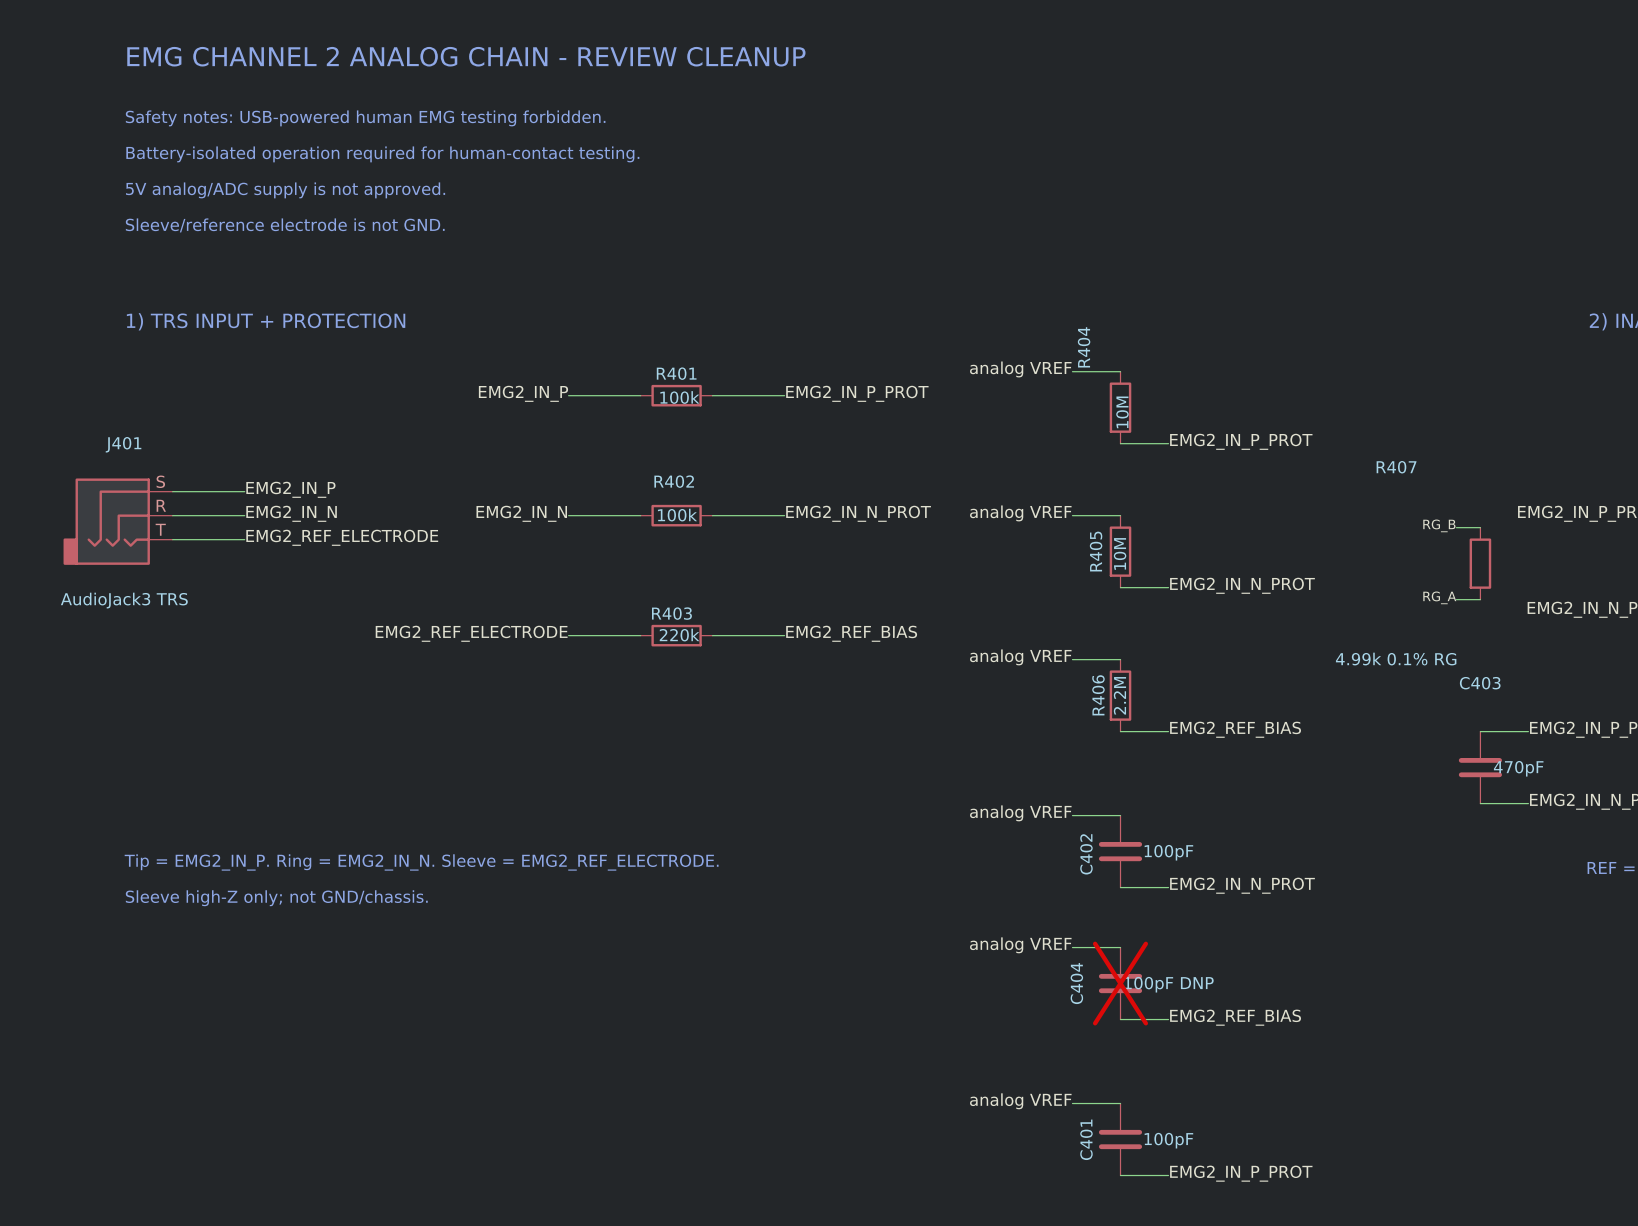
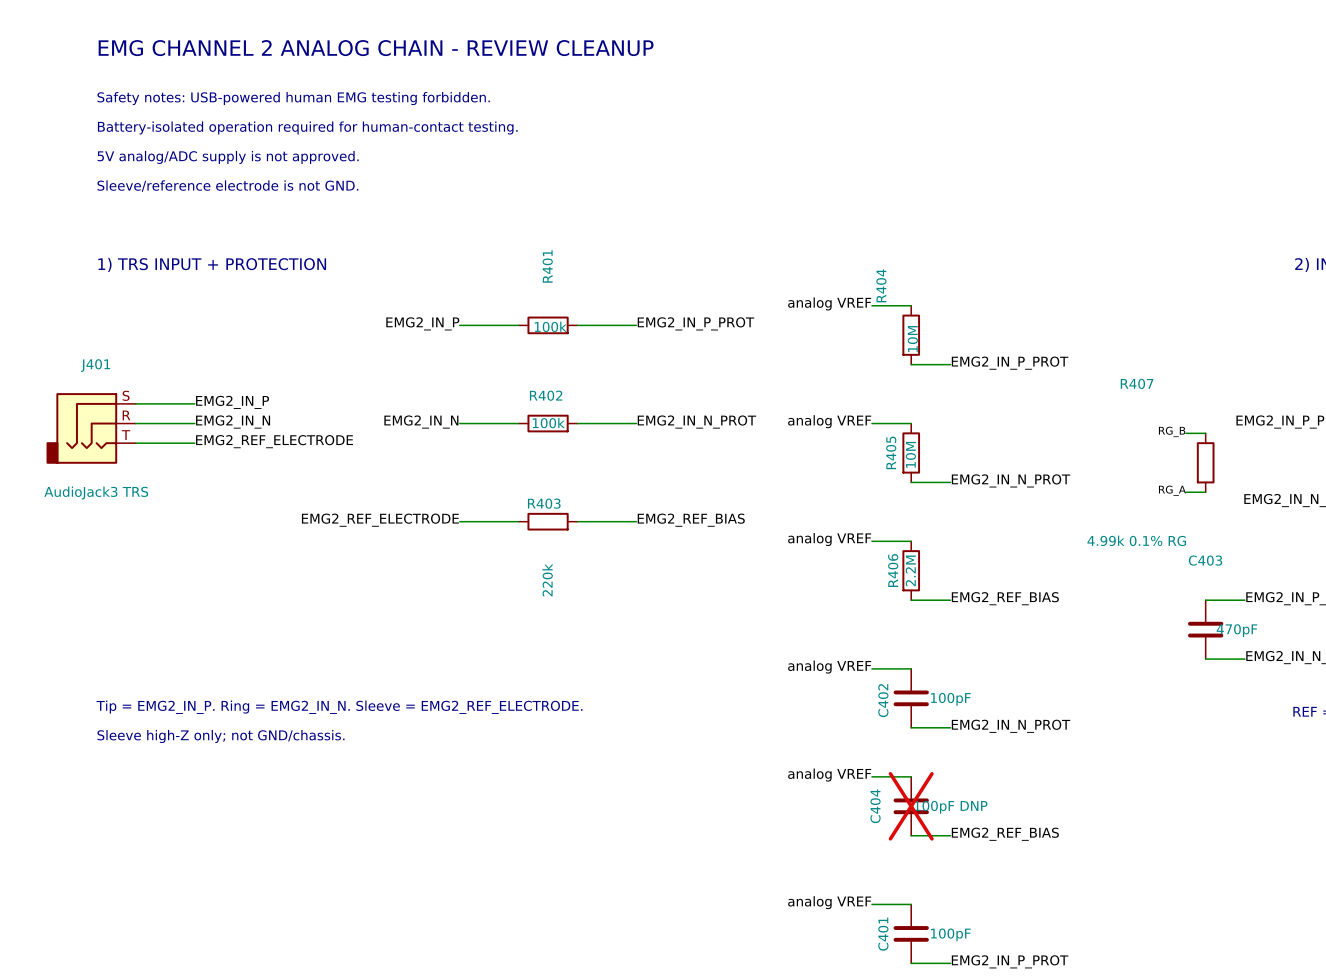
R401 name rotation: 0° (676, 373) -> 90° counterclockwise (547, 266)
R403 value rotation: 0° (679, 635) -> 90° counterclockwise (547, 580)
R403 value position: 220k (679, 635) -> 220k (547, 580)

